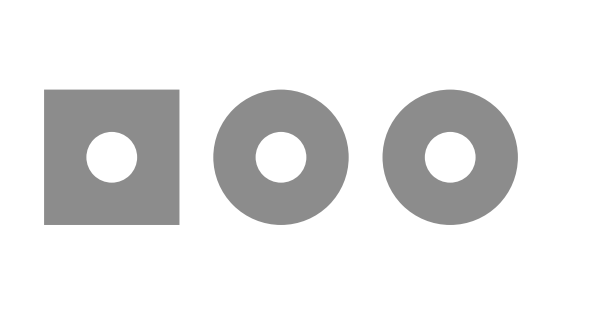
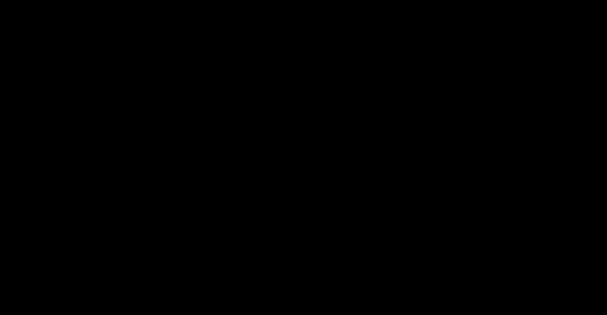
part: (280, 157) -> none

